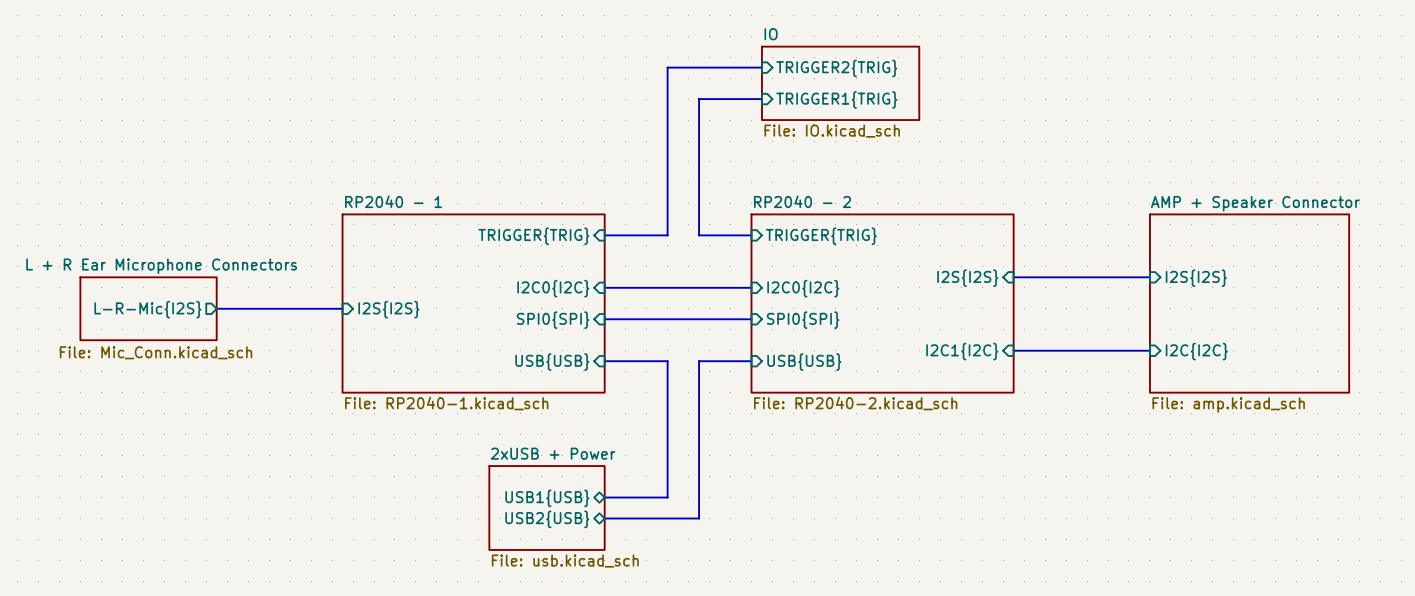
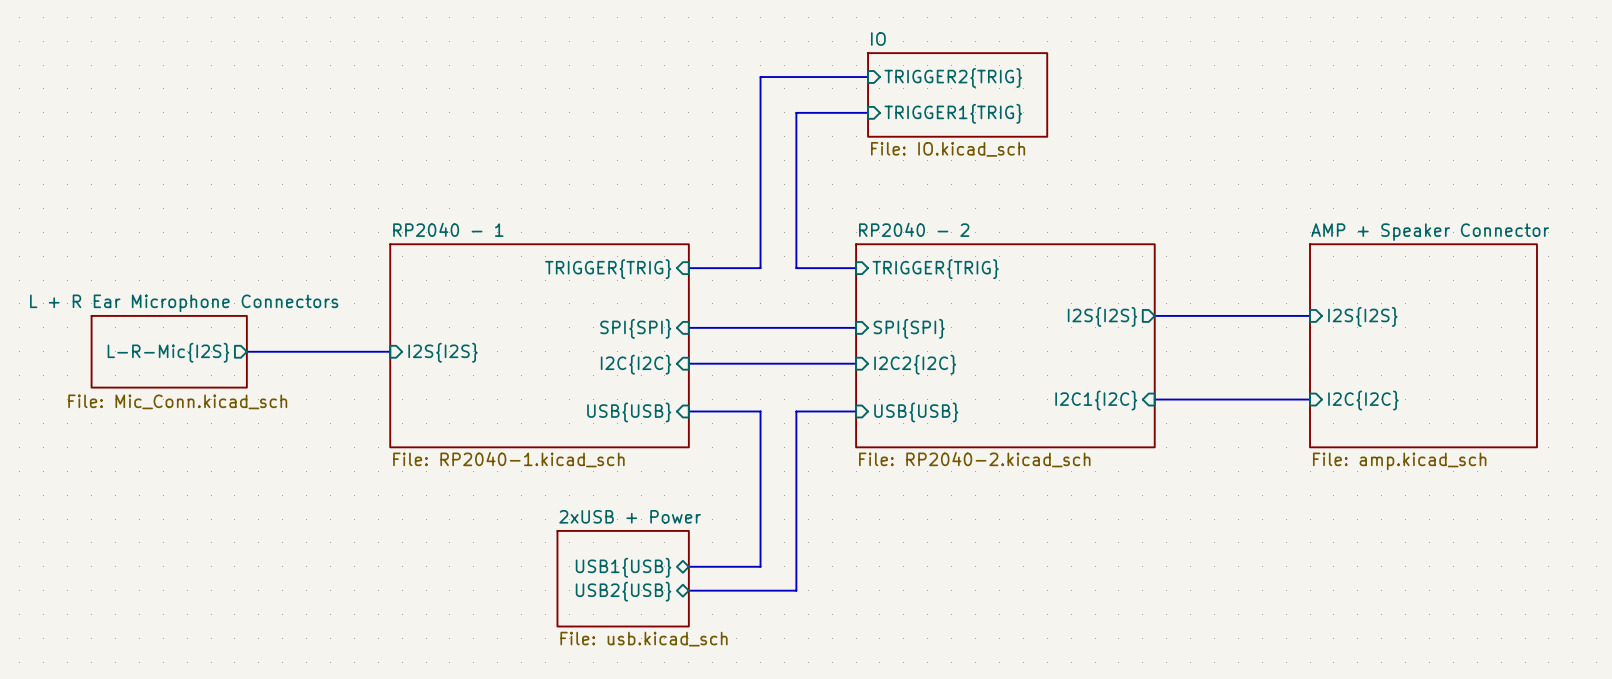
sheet pin shape: input (967, 278) -> output (1102, 316)
sheet pin: I2C0{I2C} (553, 288) -> SPI{SPI} (635, 328)
sheet pin: I2C0{I2C} (803, 288) -> SPI{SPI} (909, 328)
sheet pin: SPI0{SPI} (553, 320) -> I2C{I2C} (636, 364)
sheet pin: SPI0{SPI} (803, 320) -> I2C2{I2C} (915, 364)

